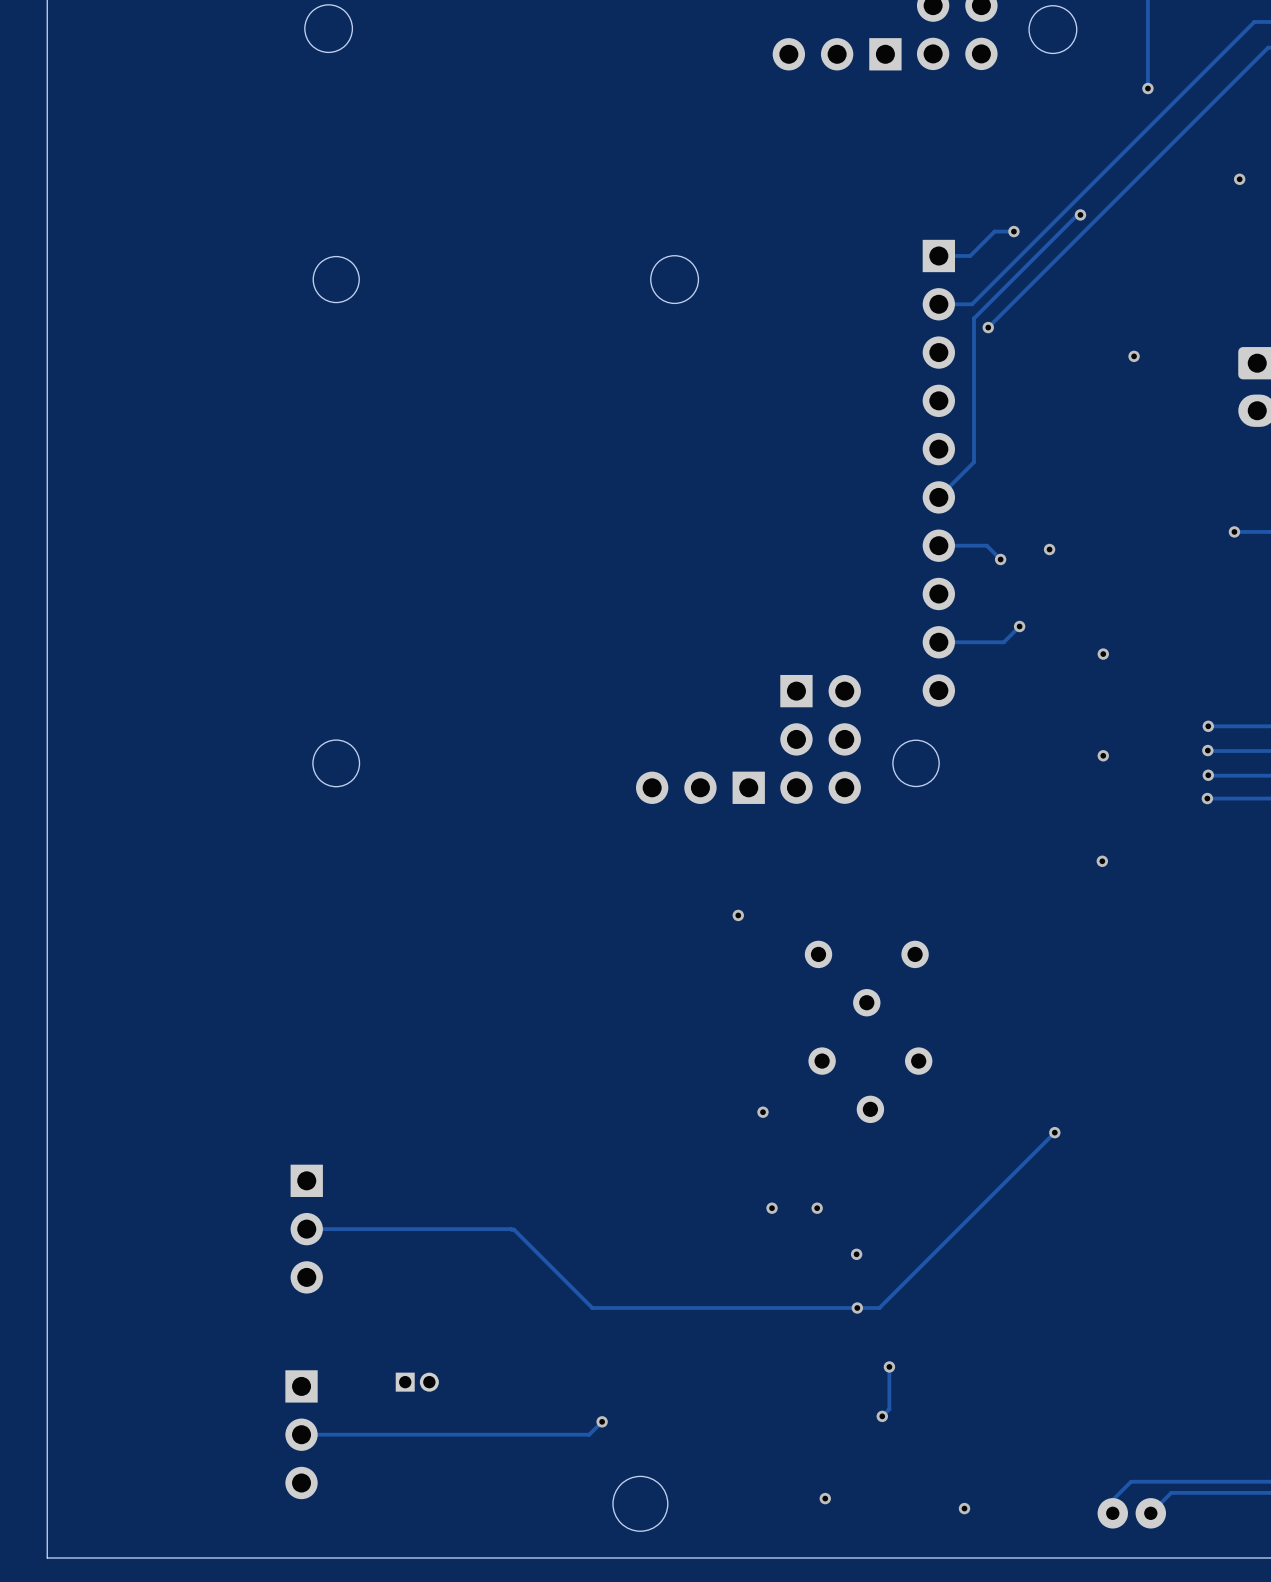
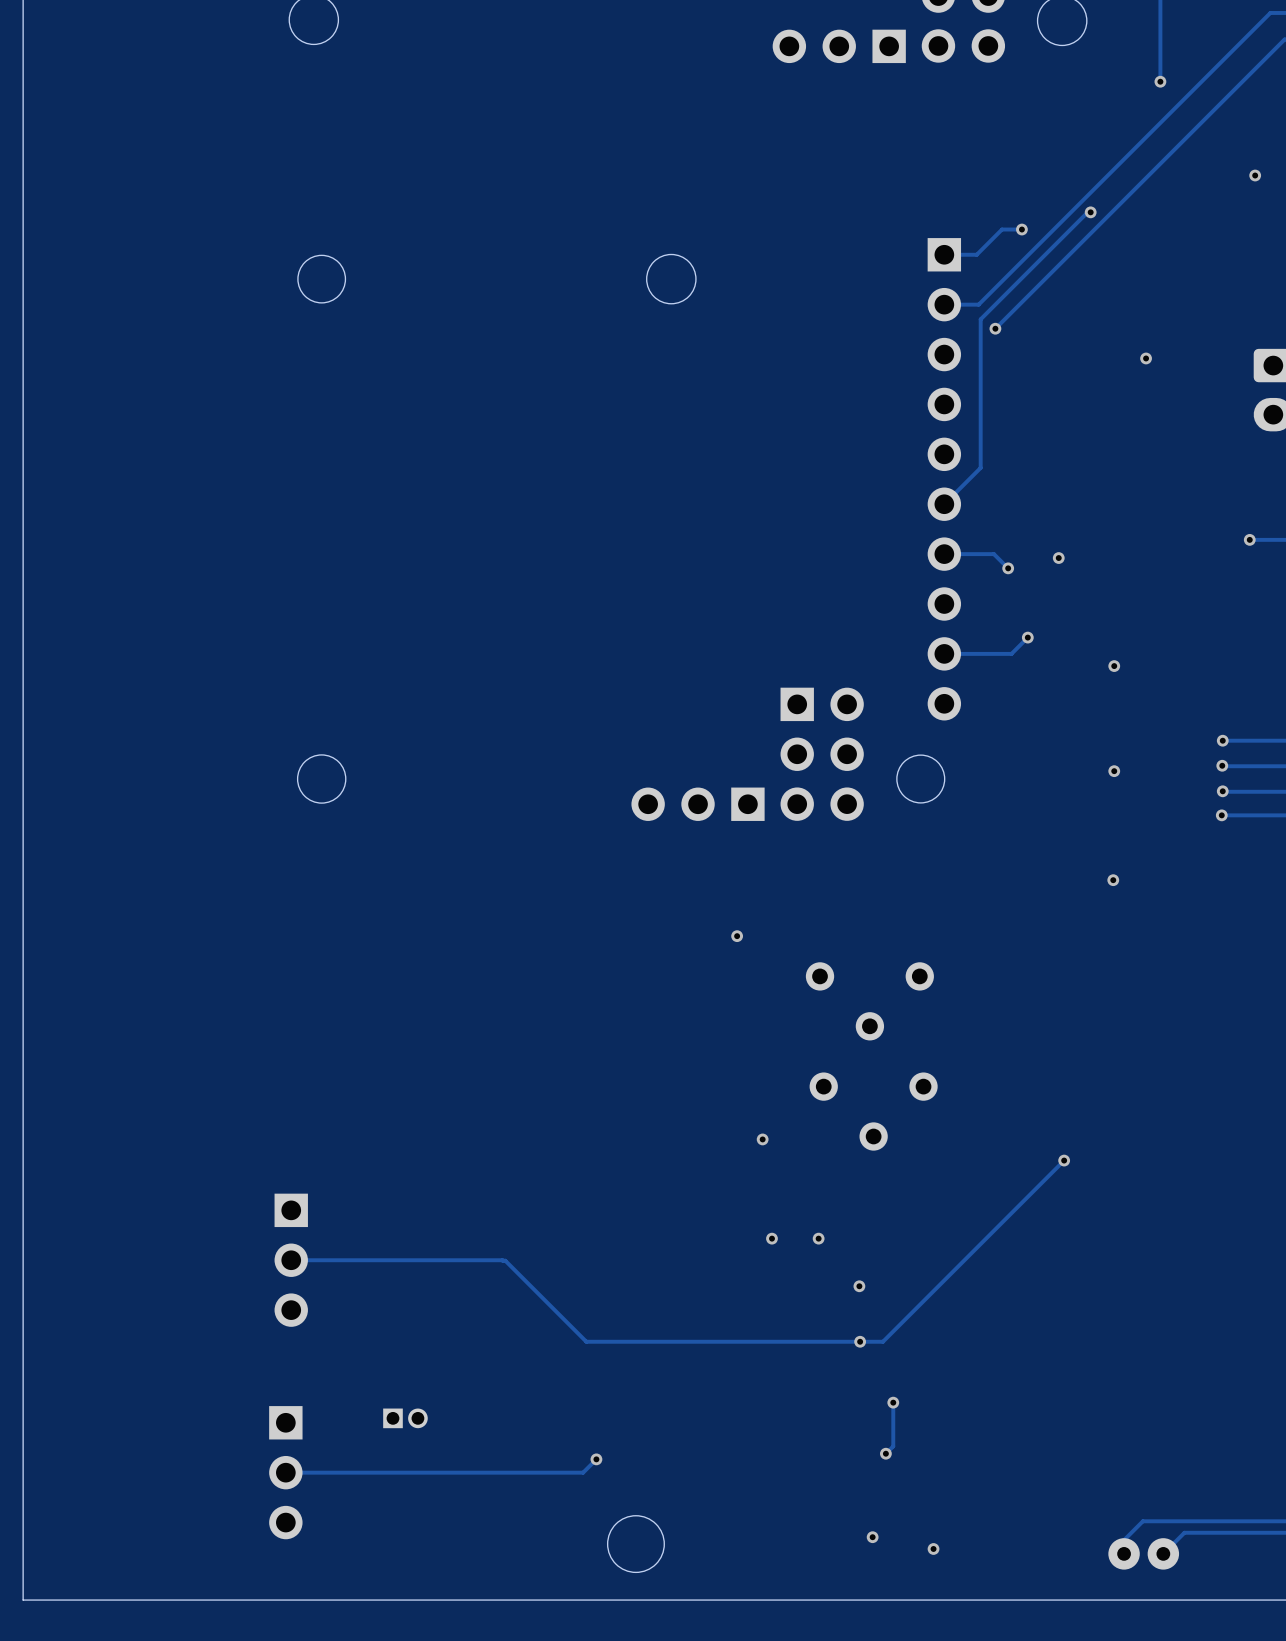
via position: (825, 1498) -> (872, 1537)
via position: (964, 1508) -> (933, 1548)

